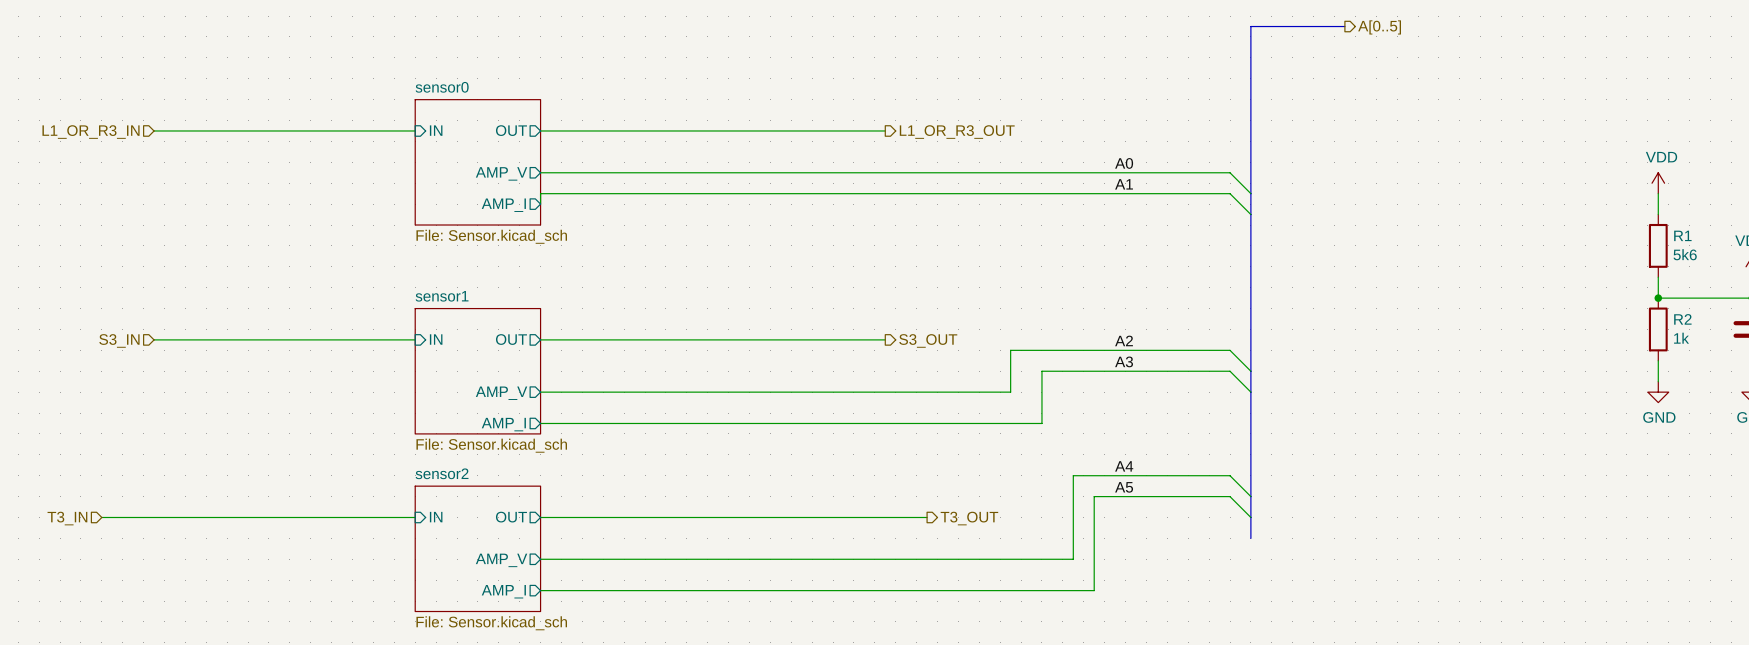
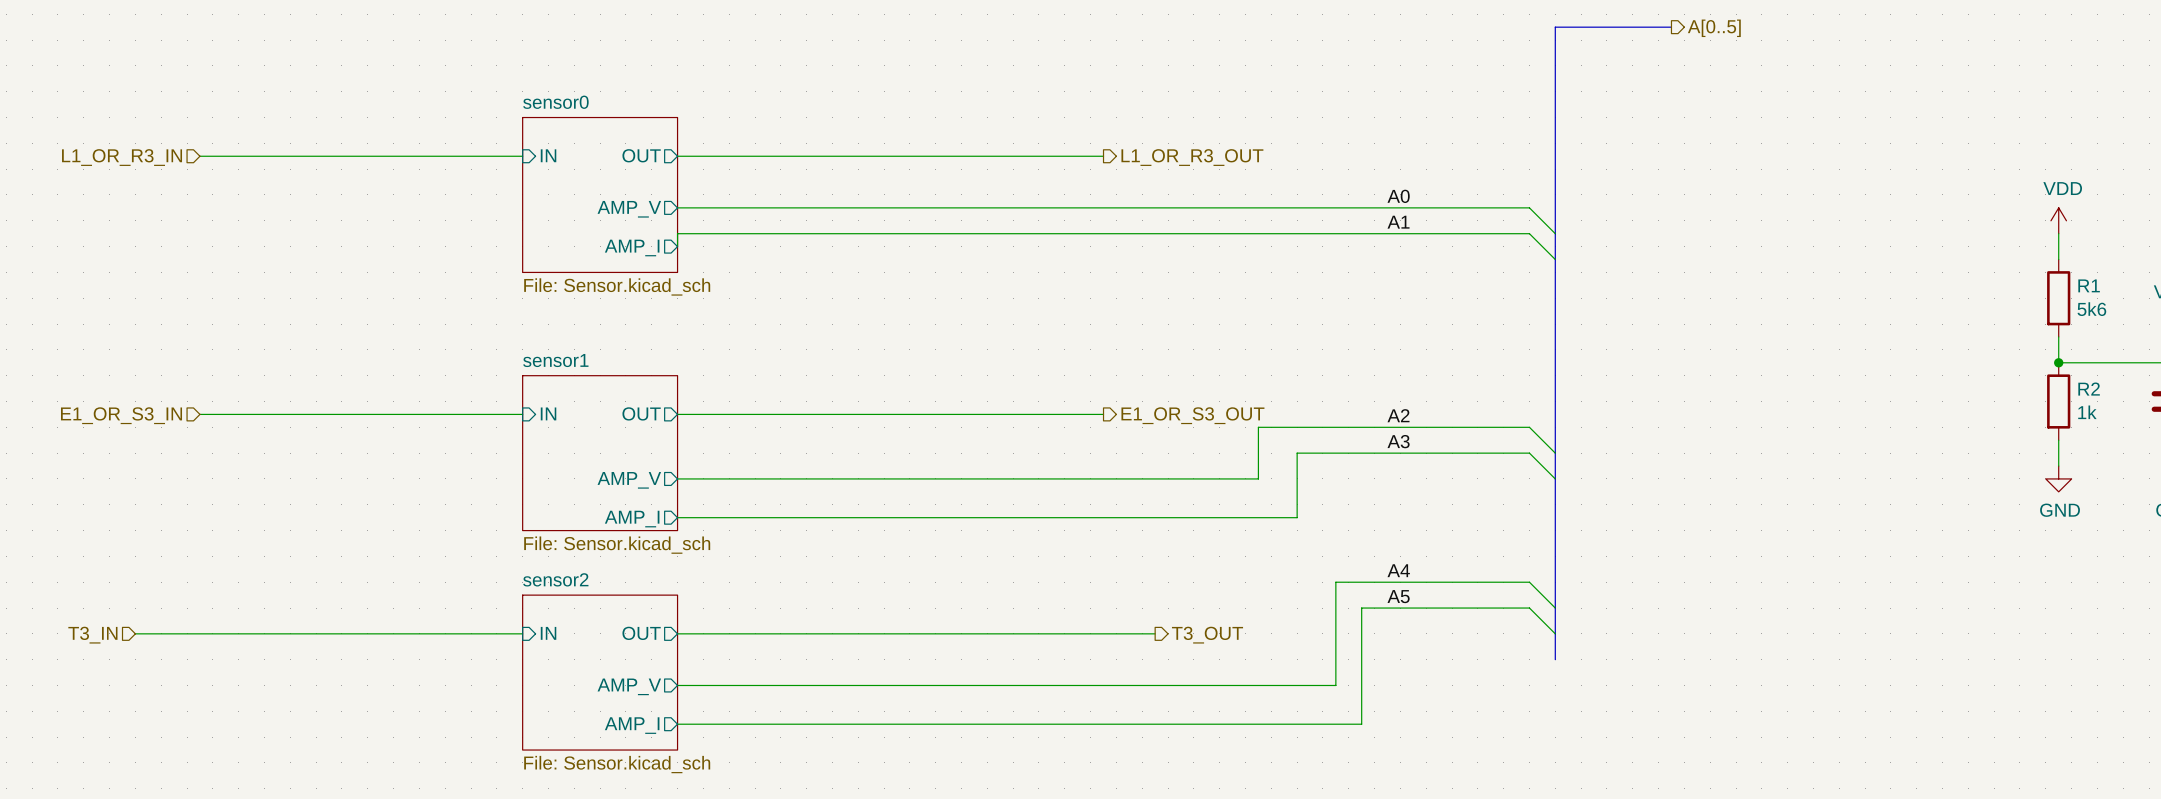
hierarchical label: S3_IN (119, 340) -> E1_OR_S3_IN (121, 415)
hierarchical label: S3_OUT (928, 340) -> E1_OR_S3_OUT (1192, 415)

